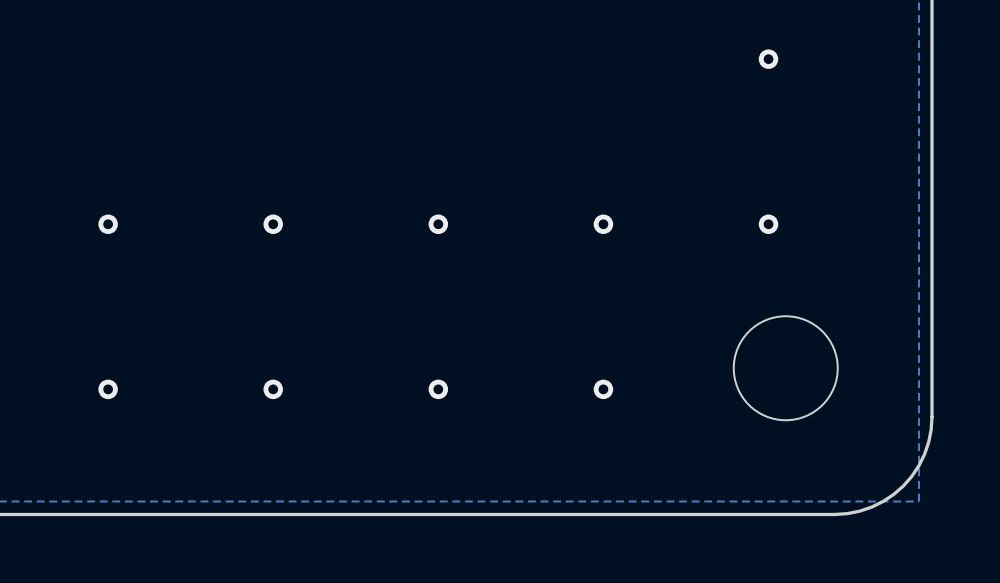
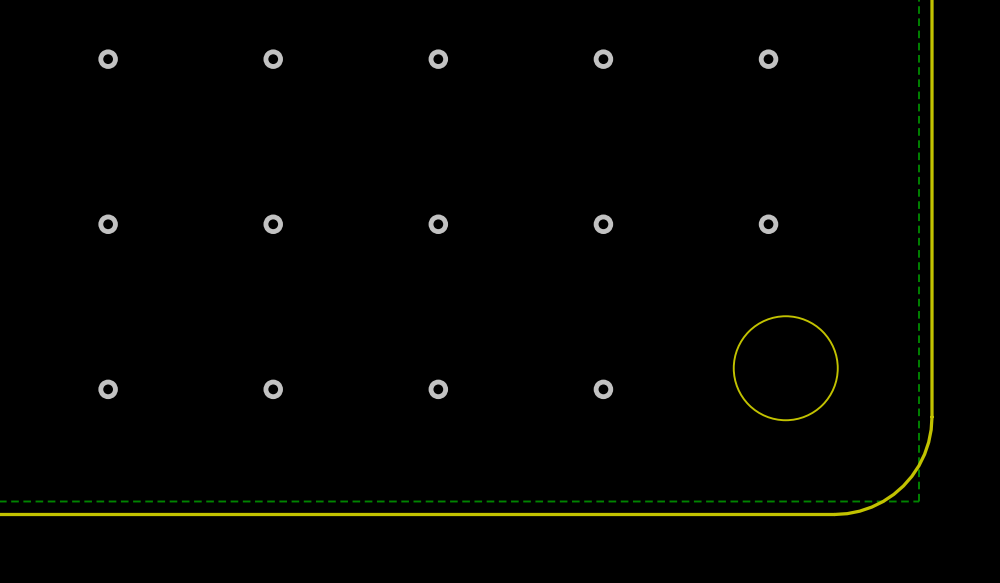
via: none -> (108, 59)
via: none -> (273, 59)
via: none -> (438, 59)
via: none -> (603, 59)

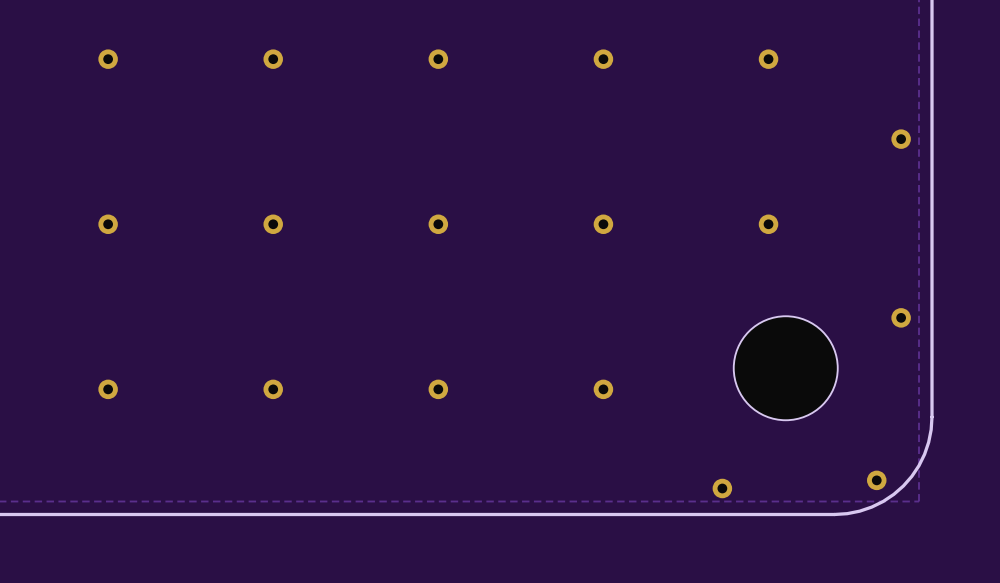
via: none -> (901, 139)
via: none -> (901, 317)
via: none -> (876, 480)
via: none -> (722, 488)

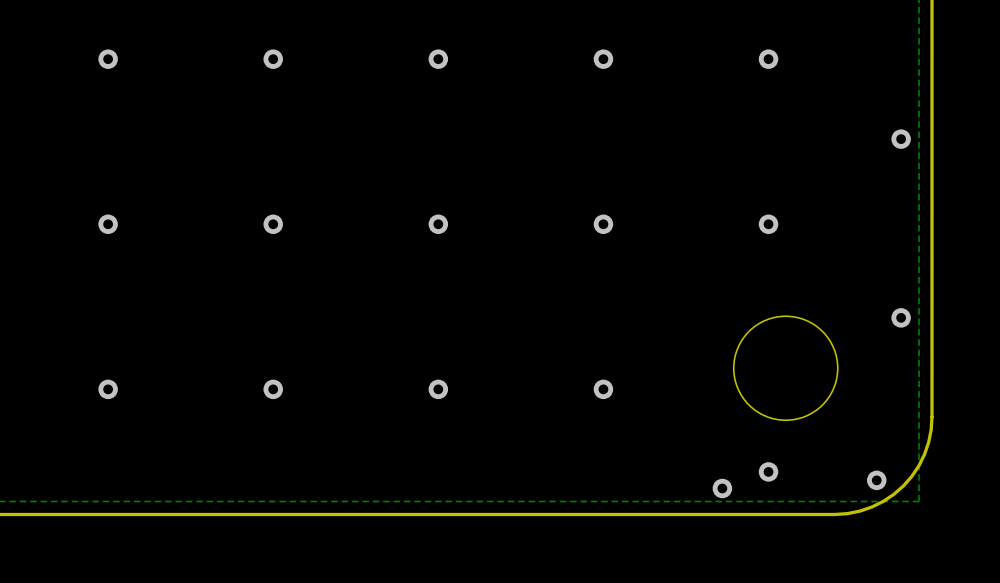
via: none -> (768, 471)

